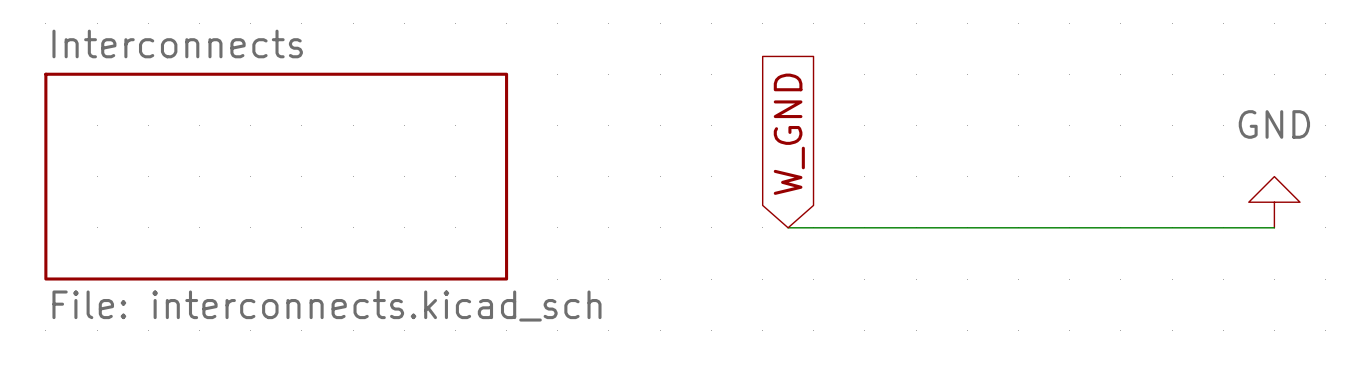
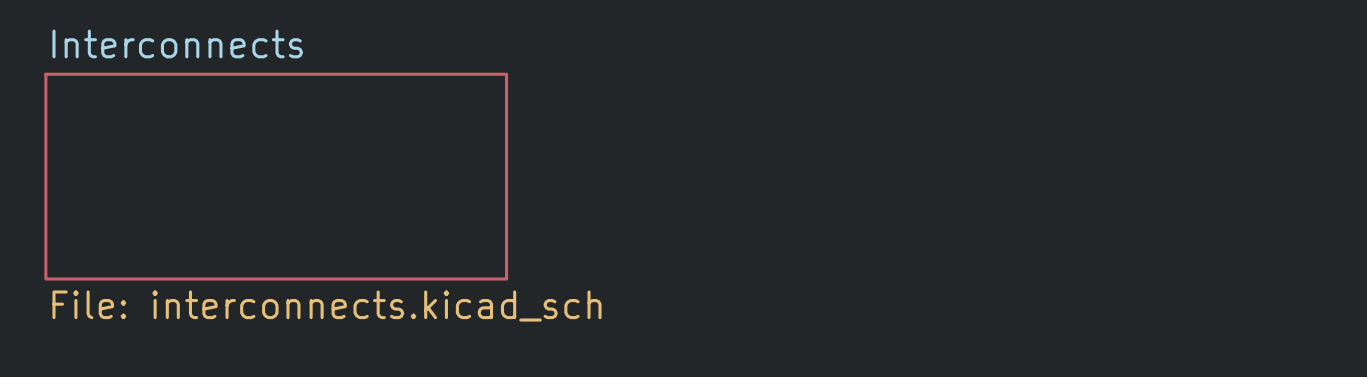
global label: W_GND (789, 134) -> none
power symbol: GND (1274, 202) -> none
wire: (788, 227) (1274, 227) -> none

